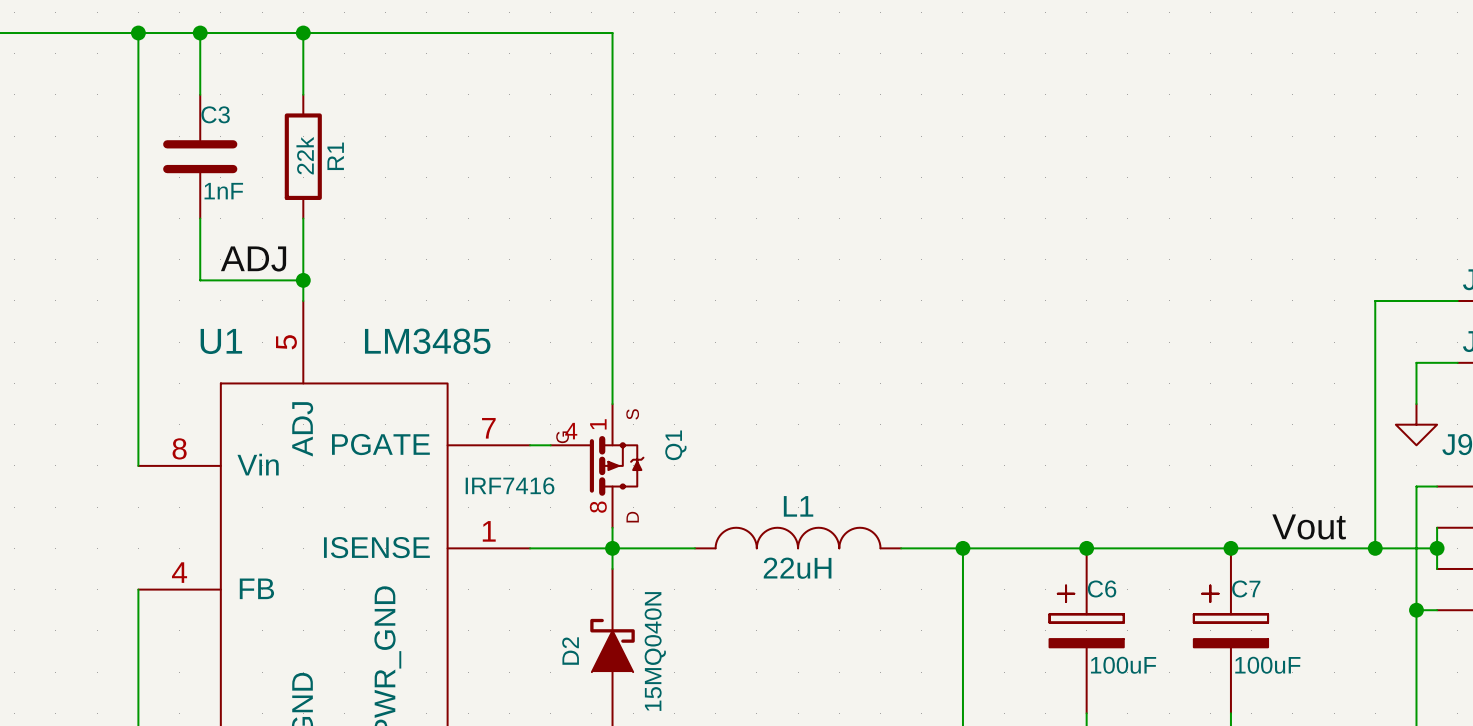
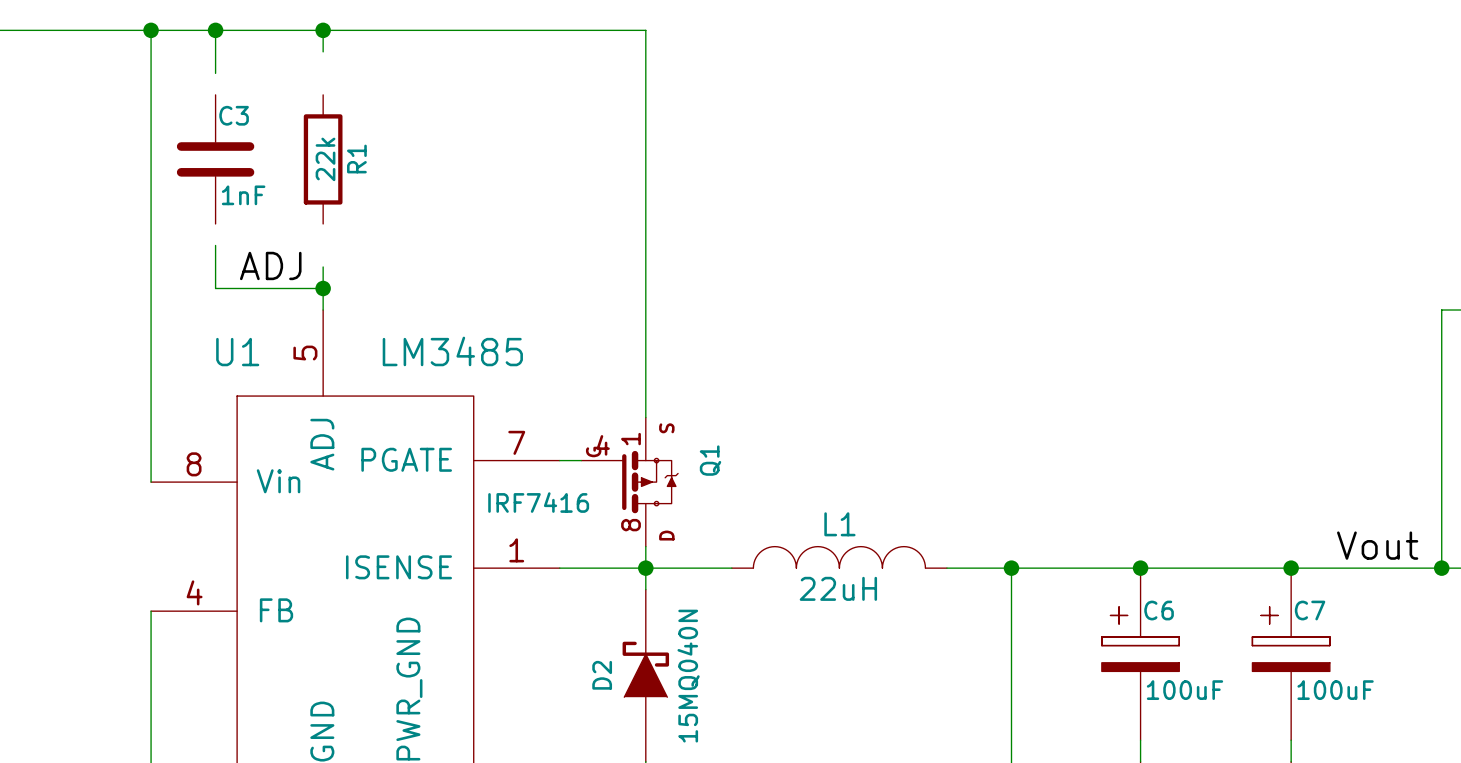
wire: (303, 53) (303, 94) -> none
wire: (200, 74) (200, 94) -> none
wire: (200, 218) (200, 239) -> none
wire: (303, 218) (303, 259) -> none

